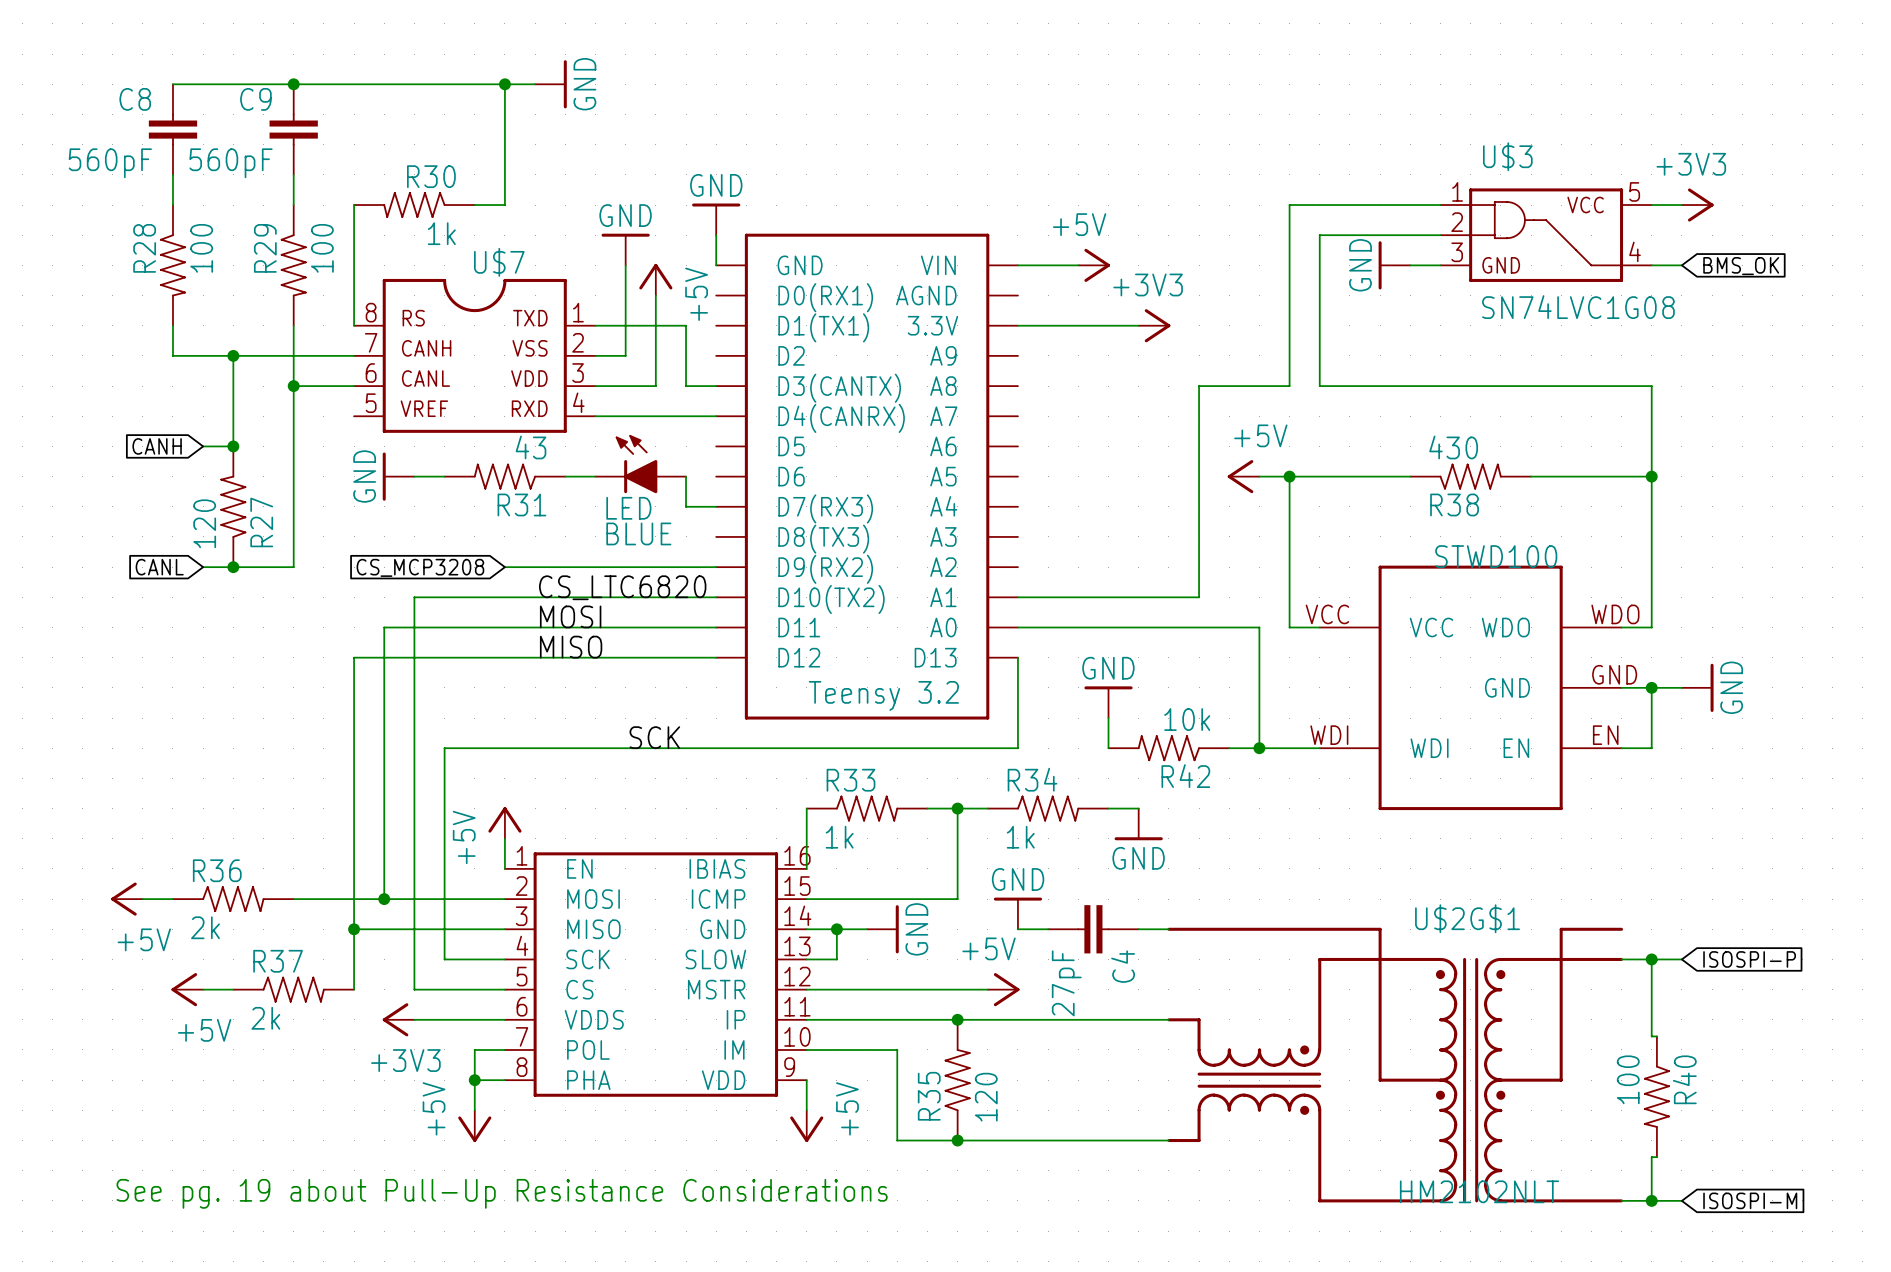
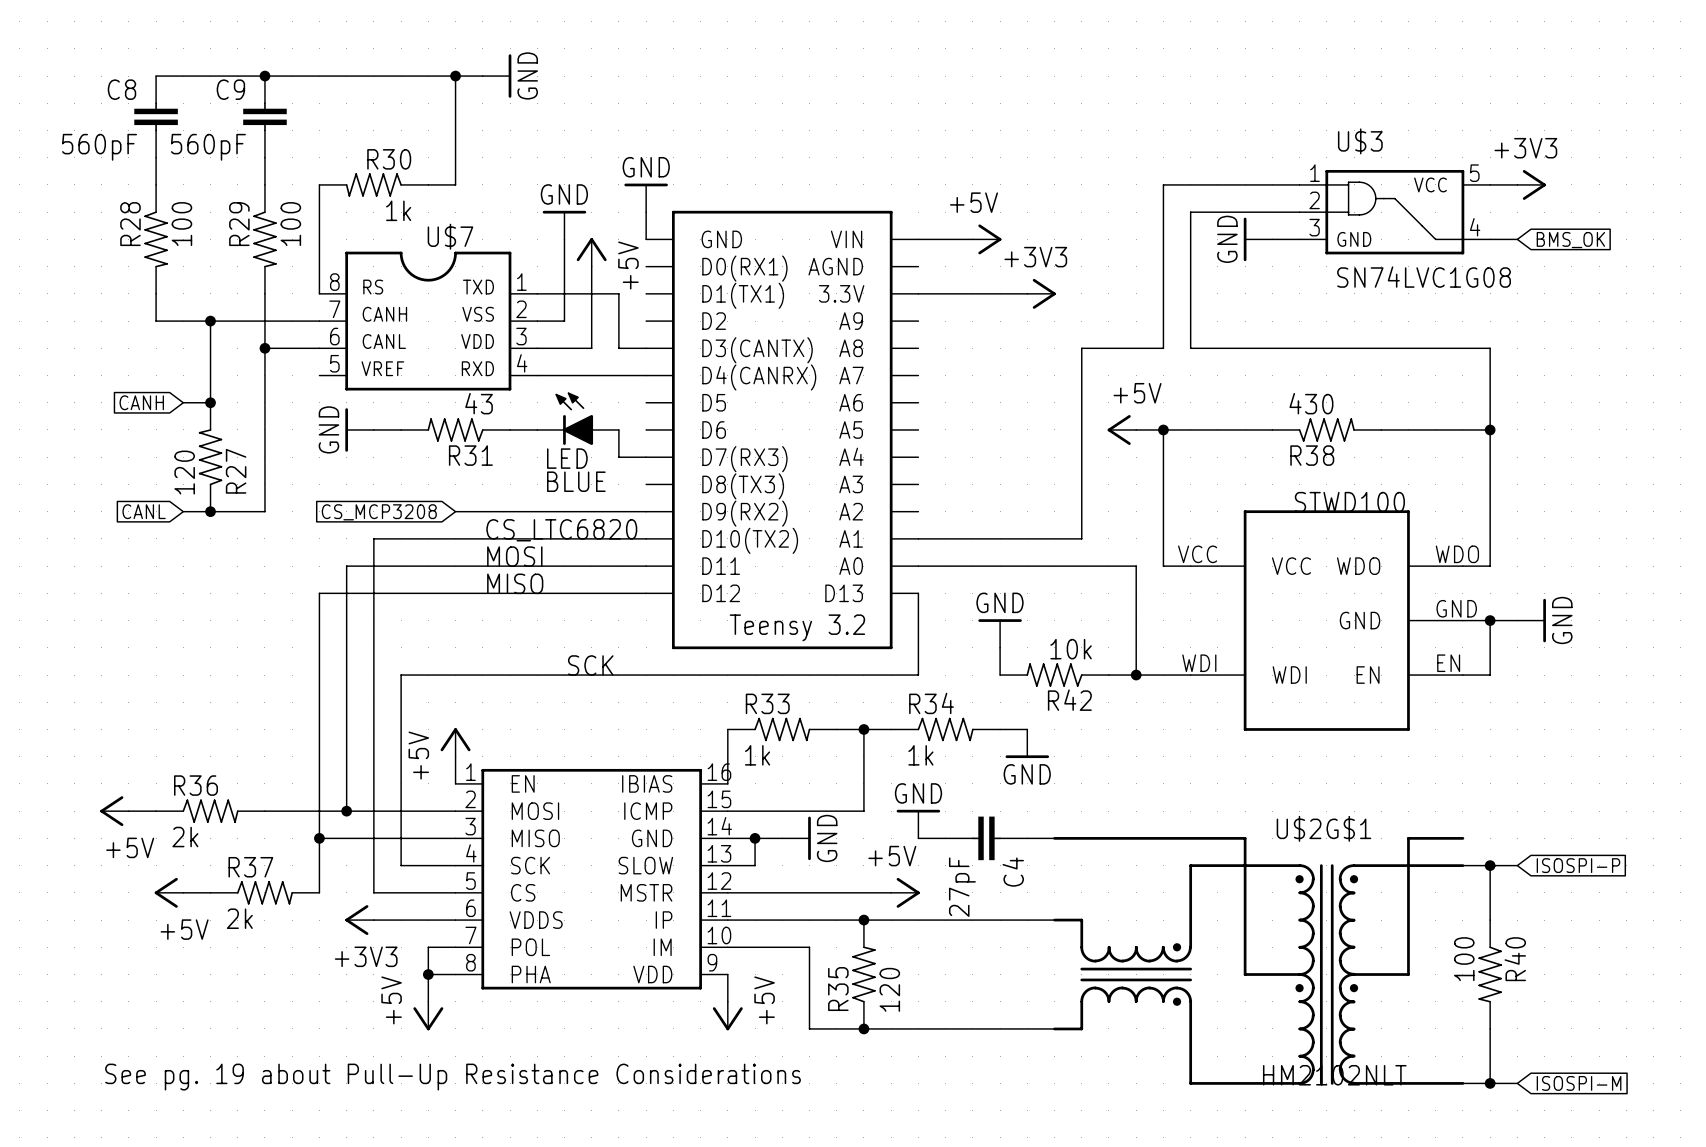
R40 position: (1656, 1096) -> (1490, 974)
wire: (1651, 1157) (1656, 1157) -> (1490, 1043) (1490, 1028)

